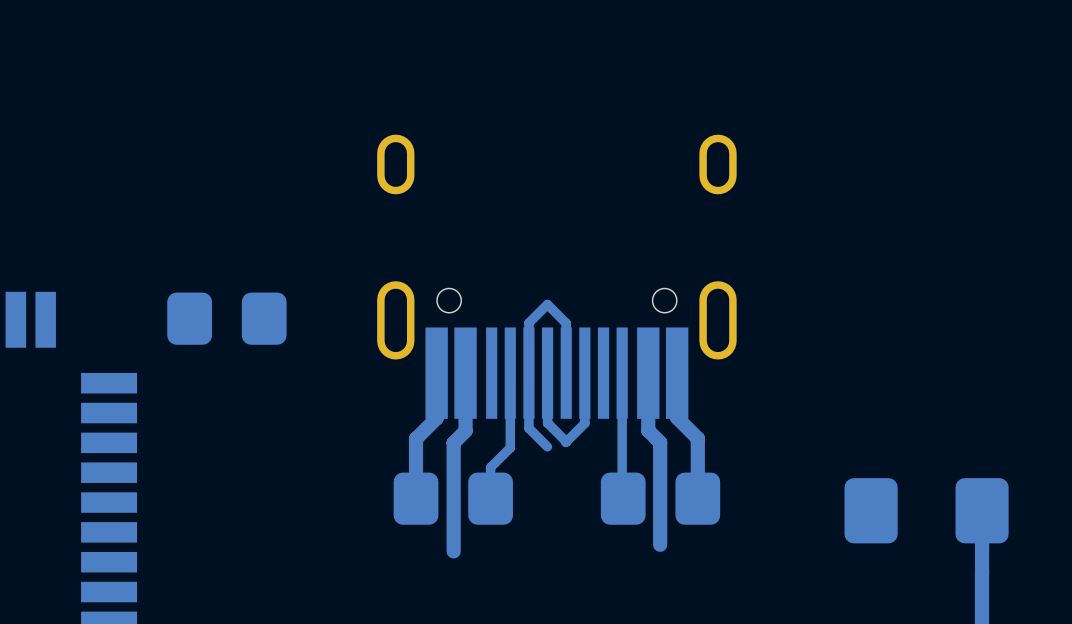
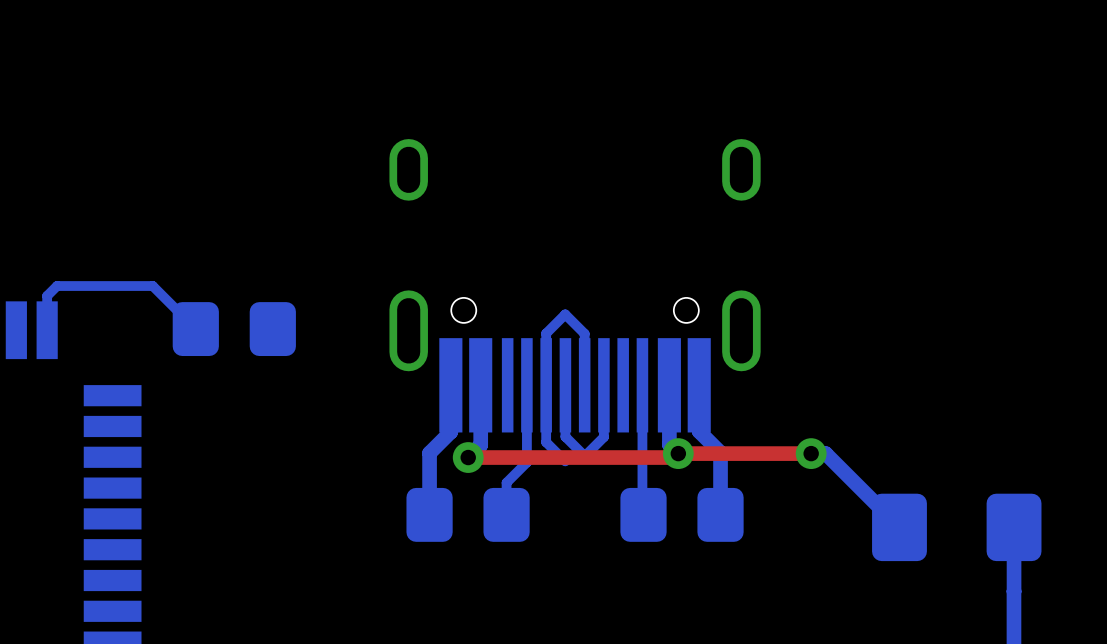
bottom track: none -> (195, 329) (152, 286) (57, 286) (47, 295) (47, 330)
bottom track: (656, 439) (660, 442) (660, 544) -> none
via: none -> (678, 453)
bottom track: none -> (811, 453) (825, 453) (899, 527)
top track: none -> (811, 453) (678, 453) (674, 457) (468, 457)
via: none -> (811, 453)
bottom track: (453, 442) (453, 551) -> none
via: none -> (468, 457)

